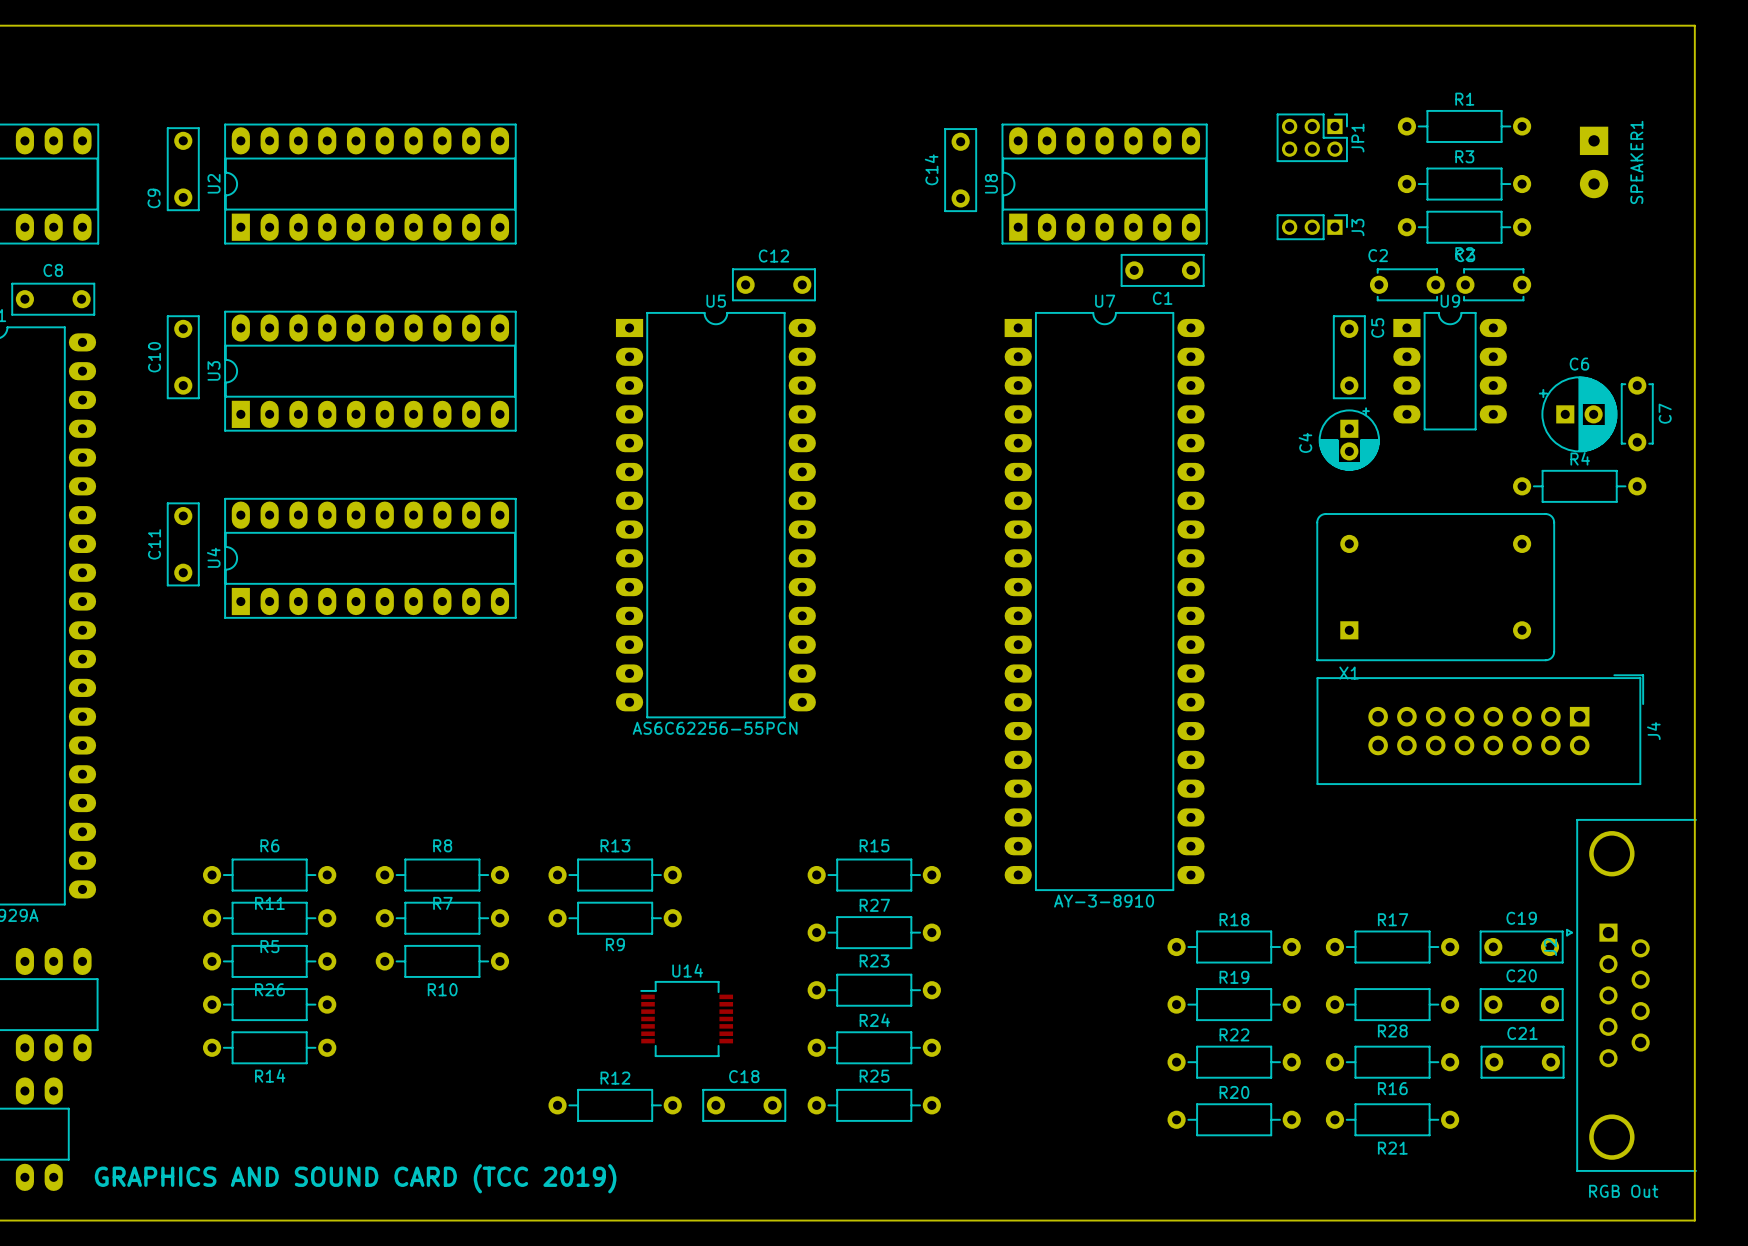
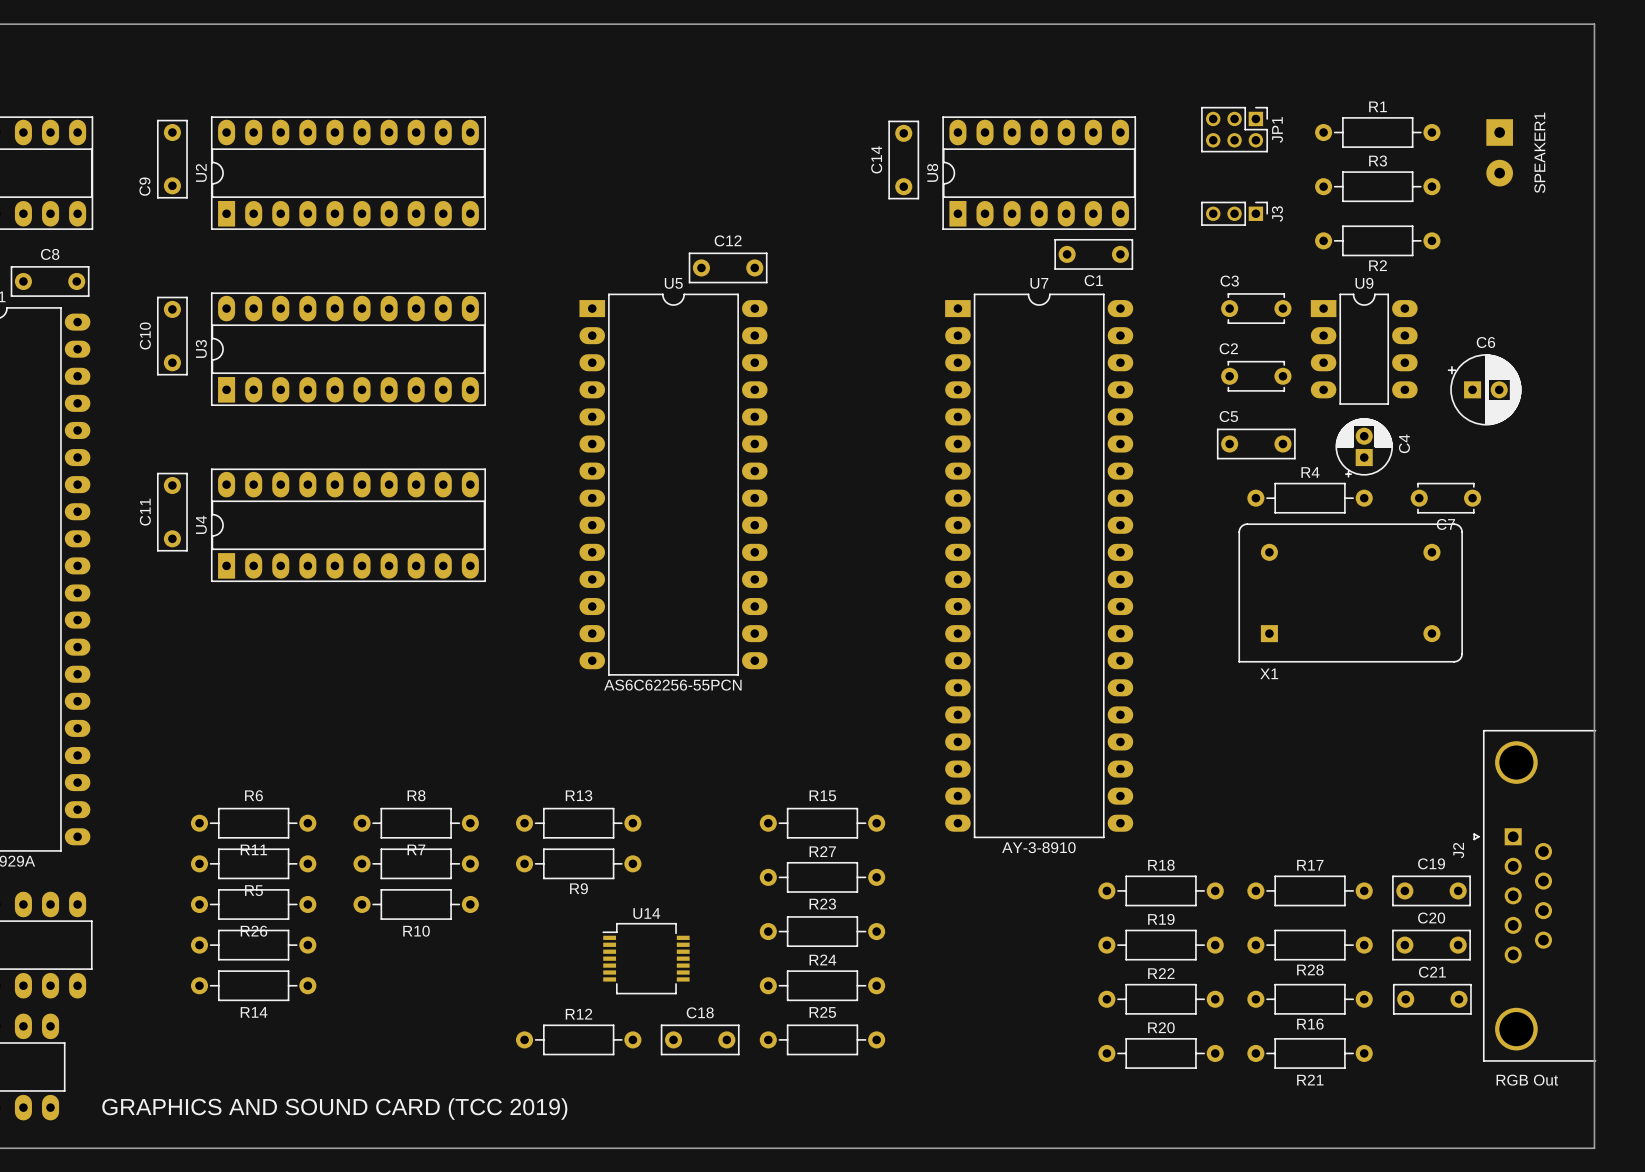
R1 position: (1464, 126) -> (1377, 132)
R3 position: (1464, 184) -> (1377, 186)
R2 position: (1464, 227) -> (1377, 240)
C2 position: (1407, 284) -> (1256, 376)
C3 position: (1493, 284) -> (1256, 308)
C5 name position: C5 (1377, 327) -> C5 (1228, 416)
C5 rotation: 0° (1349, 357) -> 90° clockwise (1256, 444)
C5 position: (1349, 357) -> (1256, 444)
C7 rotation: 0° (1637, 413) -> 90° clockwise (1445, 498)
C7 position: (1637, 413) -> (1445, 498)
C4 rotation: 0° (1349, 439) -> 180° (1364, 447)
C4 position: (1349, 439) -> (1364, 447)
R4 position: (1579, 486) -> (1310, 498)
X1 position: (1435, 587) -> (1350, 592)
J4: (1480, 729) -> none
J2 position: (1631, 995) -> (1534, 895)

